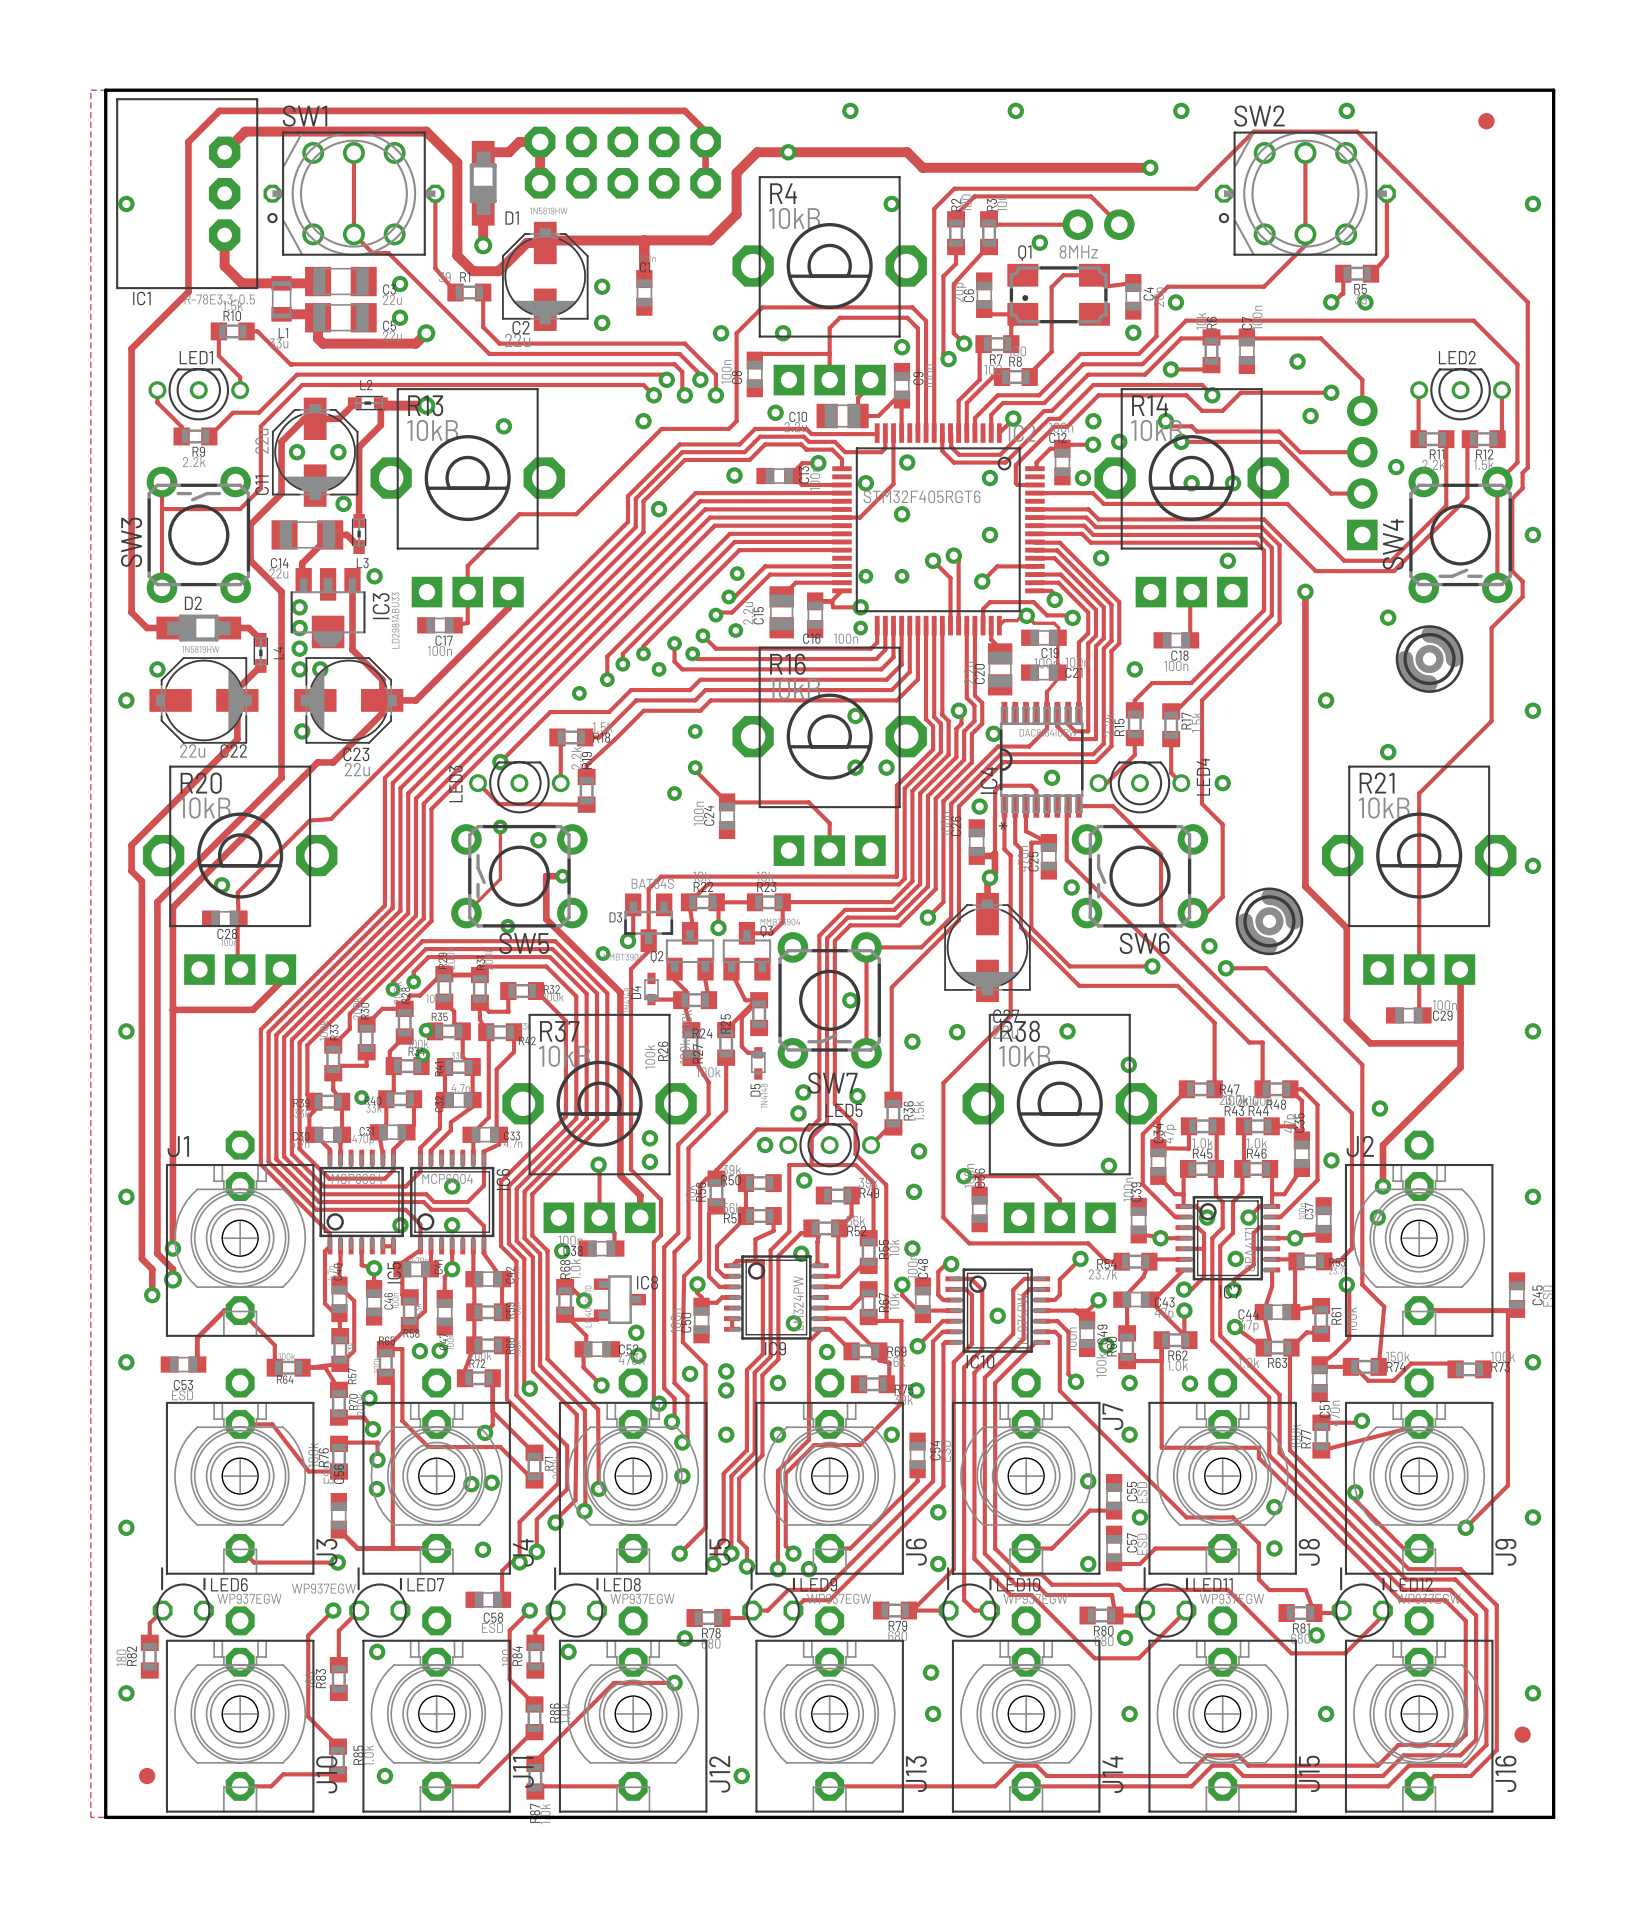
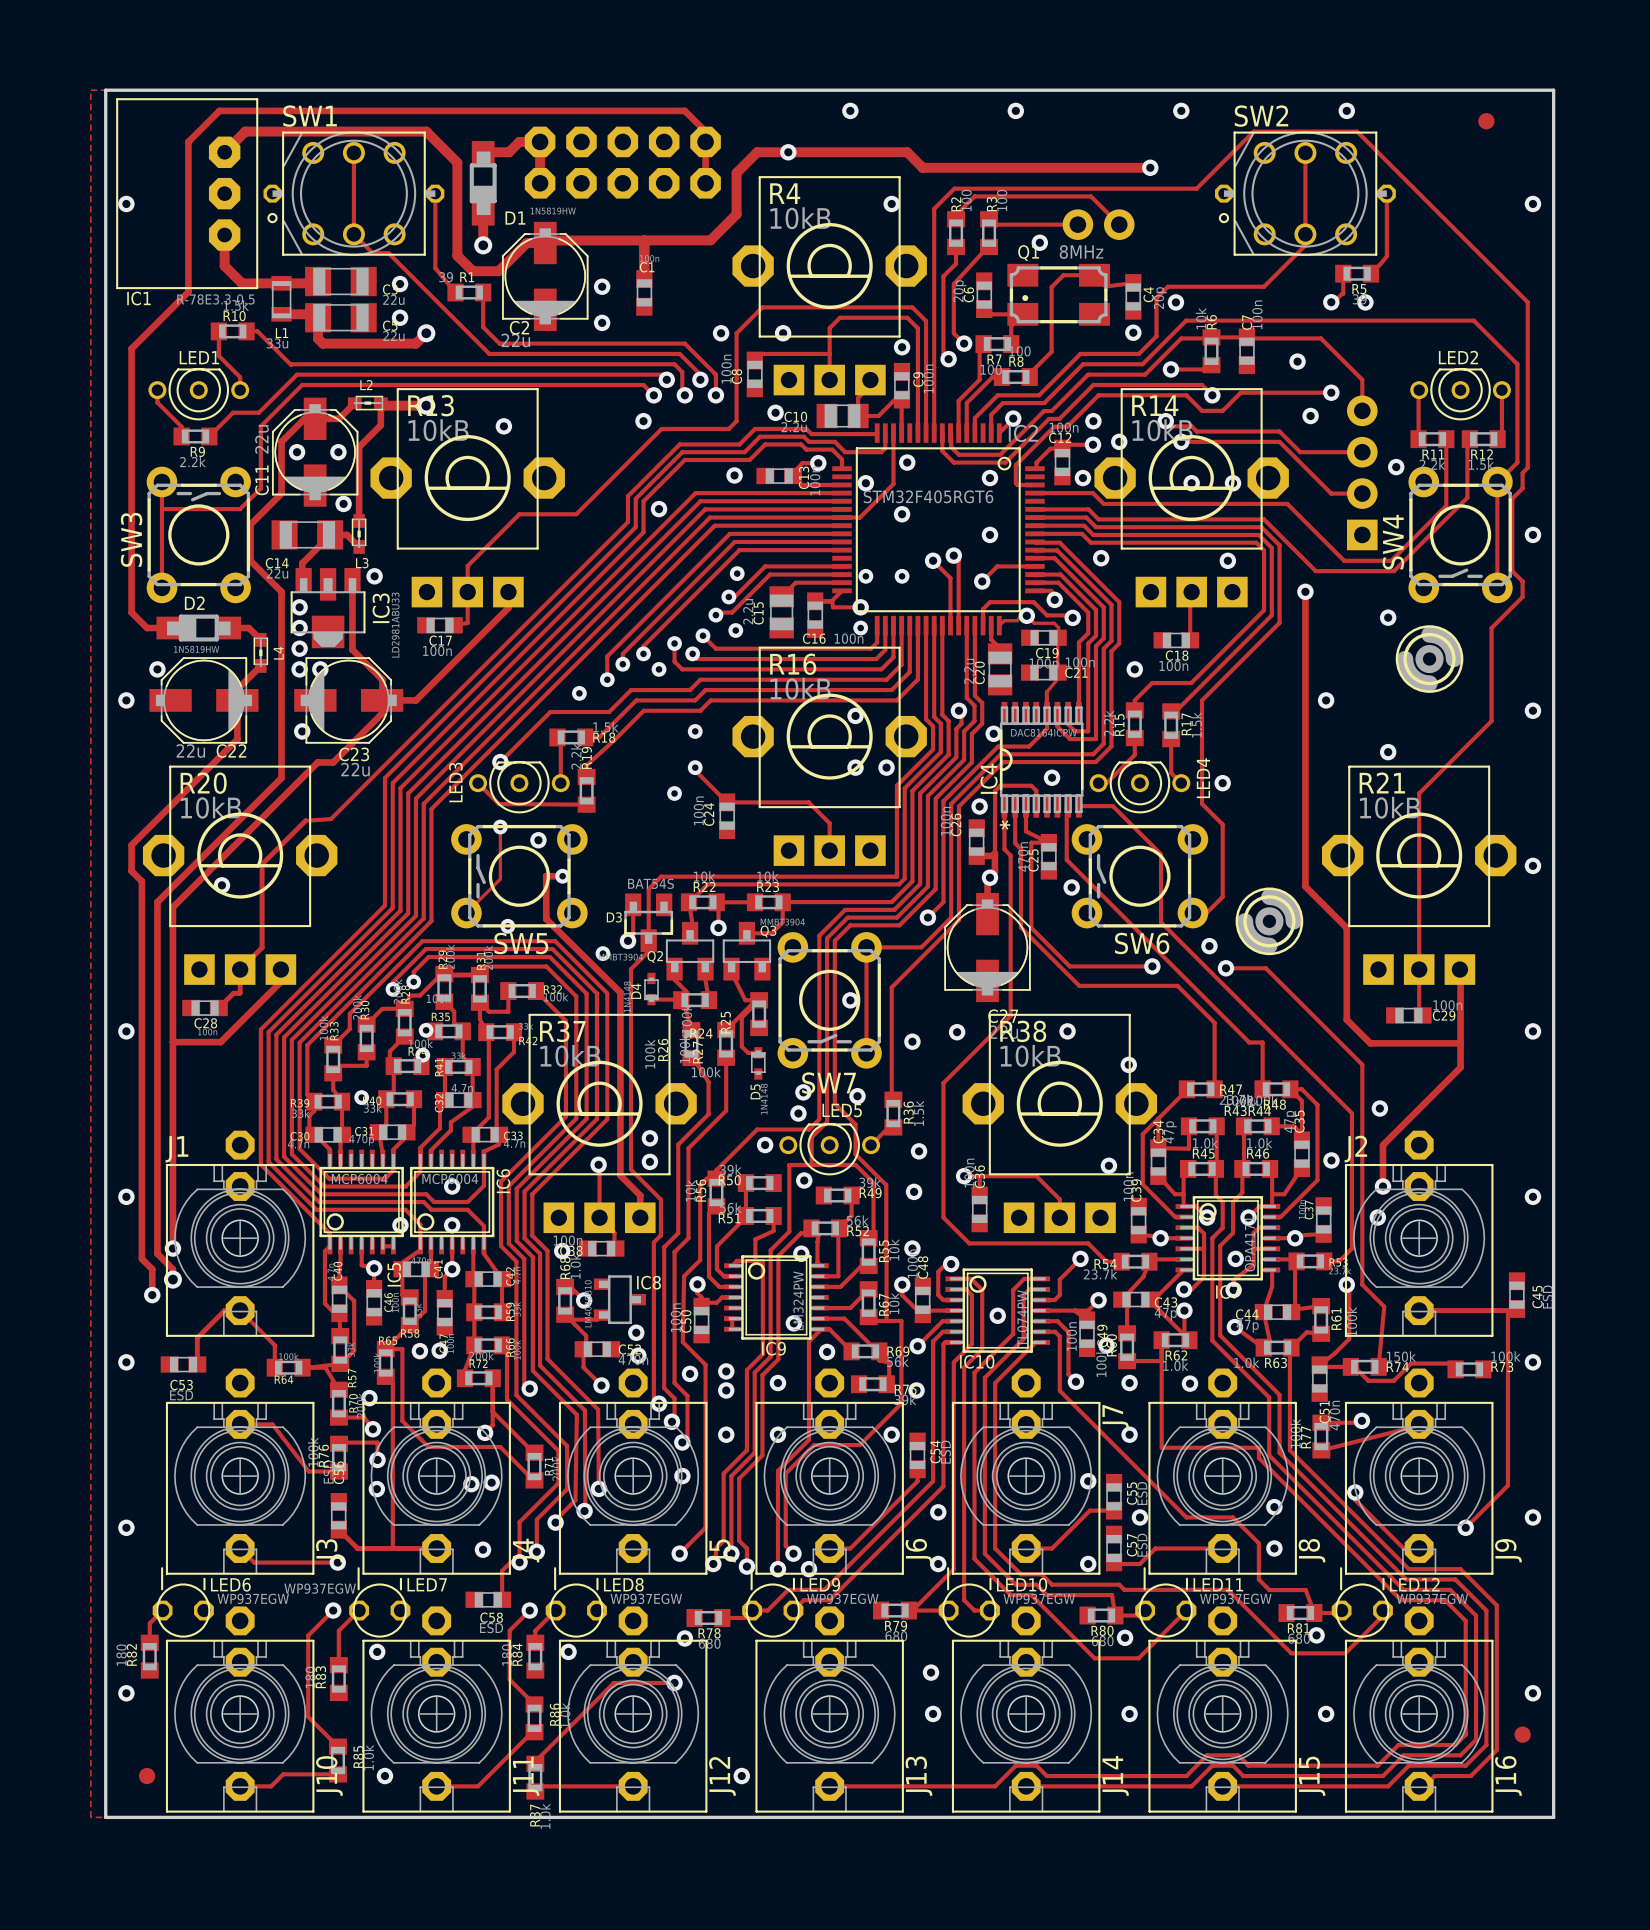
track: (309, 820) (237, 892) (237, 967) (240, 969) -> (309, 820) (305, 820) (262, 864) (262, 947) (240, 969) (240, 992) (233, 993) (218, 1008)
C28 position: (224, 918) -> (205, 1008)
track: (172, 1009) (252, 1009) -> (172, 1042) (220, 1042) (252, 1009)

